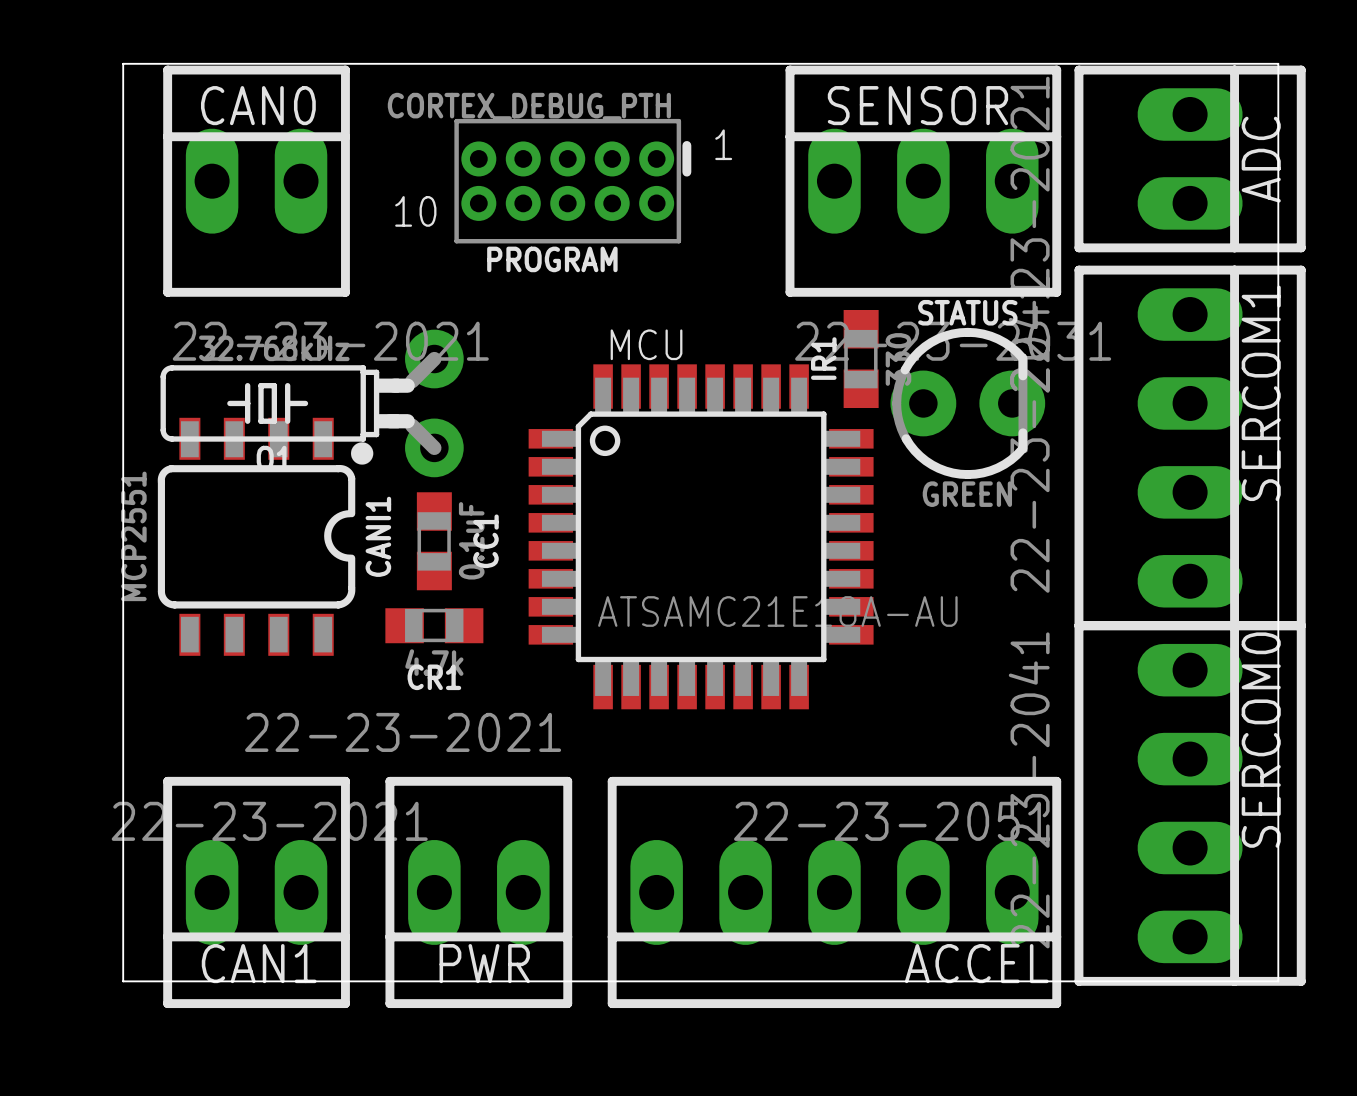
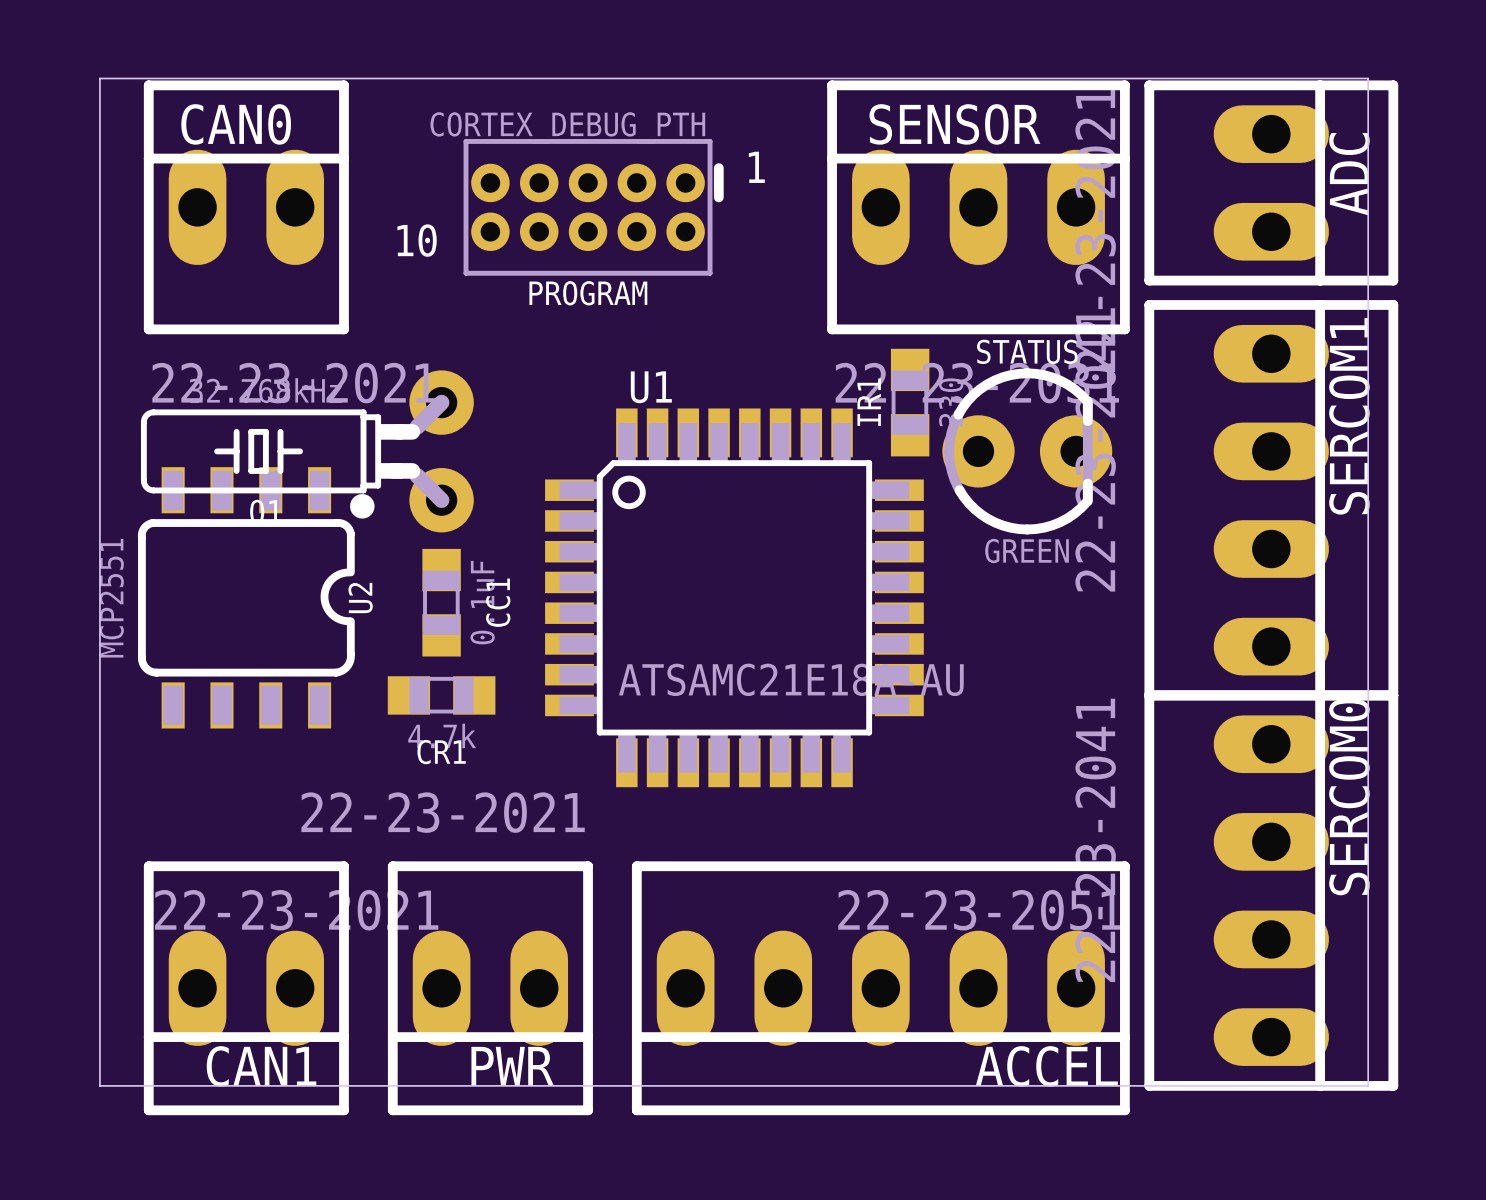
MCU name: MCU (646, 344) -> U1 (651, 387)
CANI1 name: CANI1 (378, 536) -> U2 (360, 598)

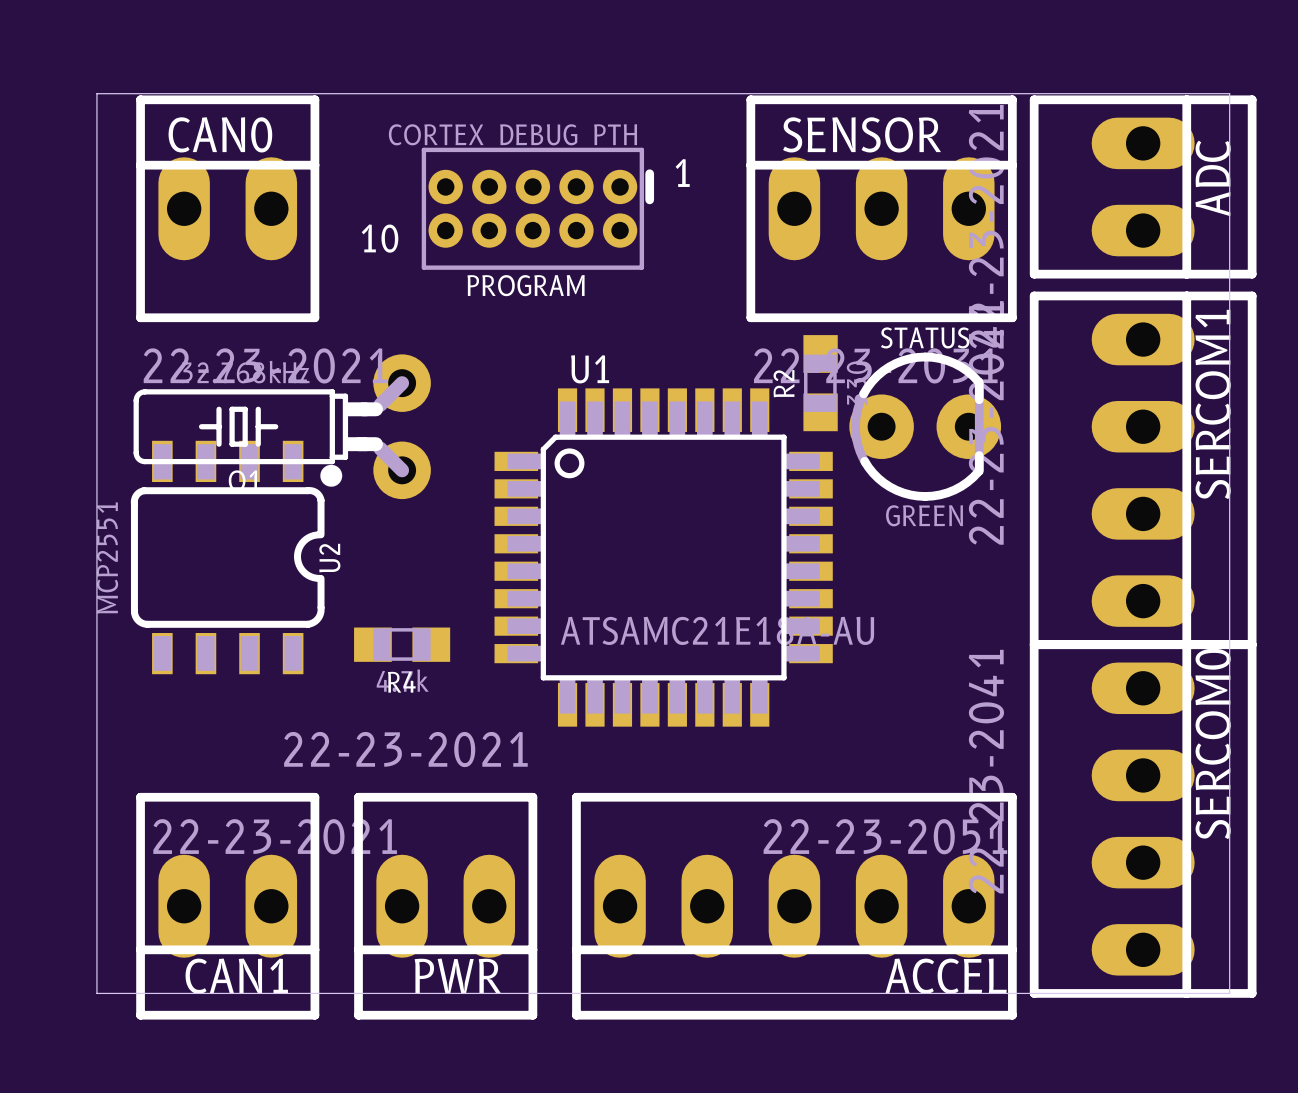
IR1 name: IR1 (869, 402) -> R2 (783, 383)
CC1: 0.1uF (441, 602) -> none
CR1 name: CR1 (441, 752) -> R4 (401, 682)

